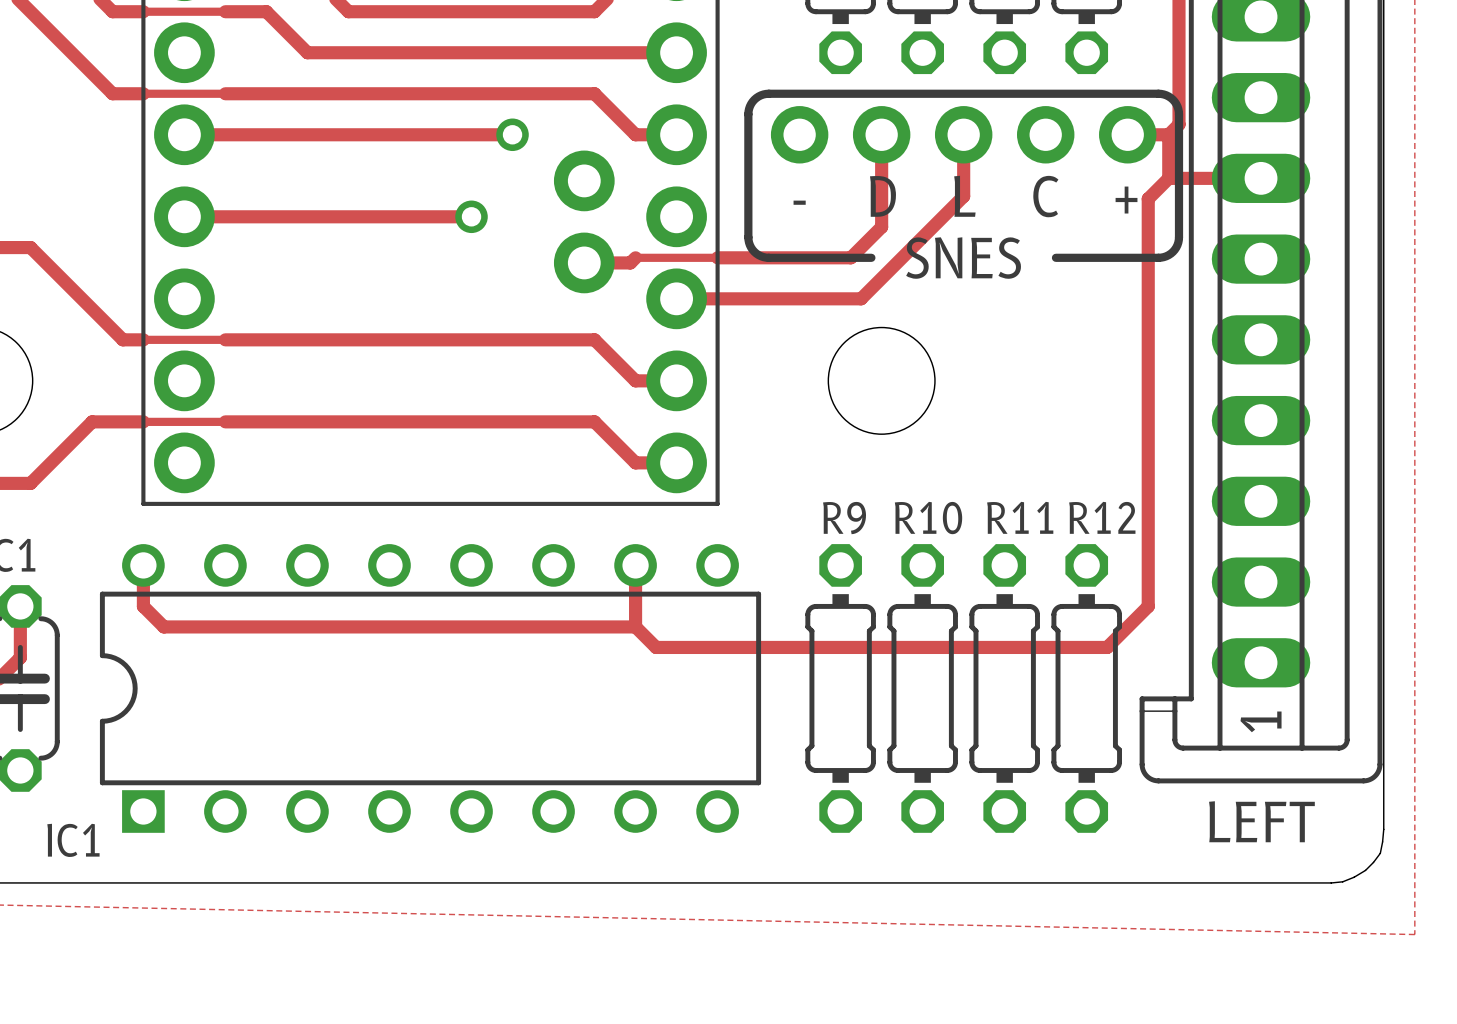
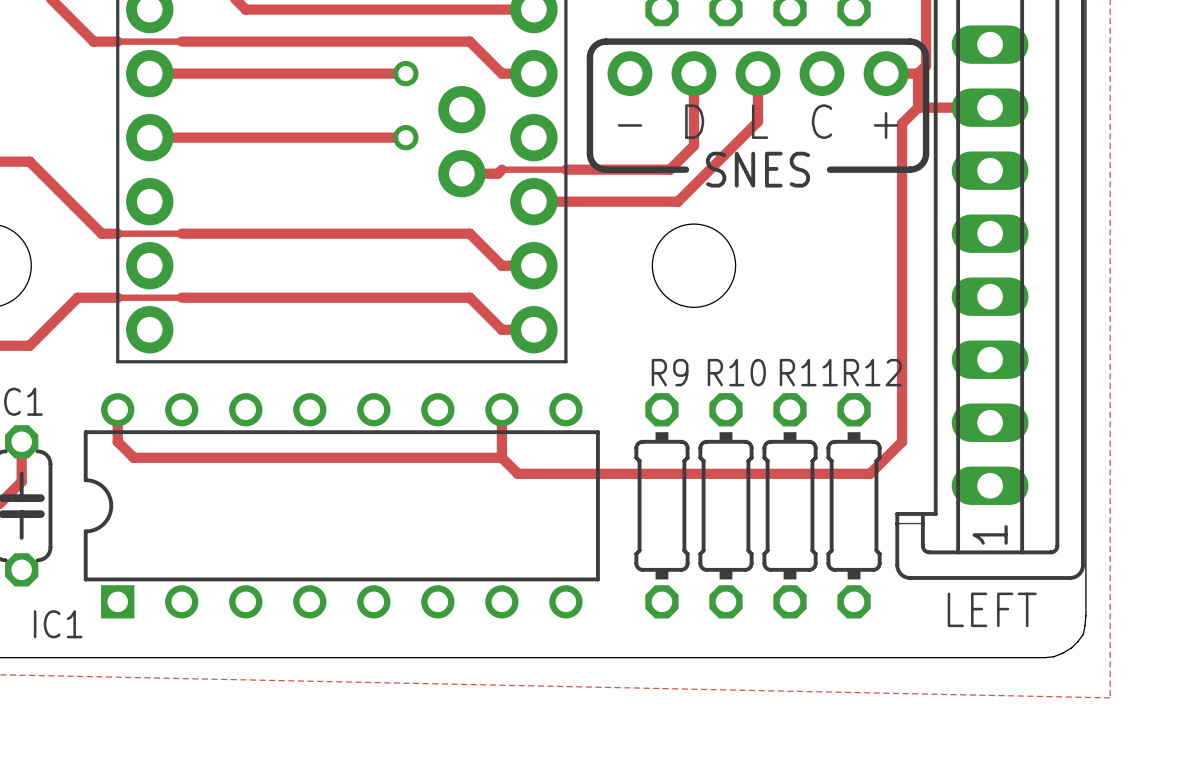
track: none -> (373, 137) (405, 137)
via position: (471, 216) -> (405, 137)

